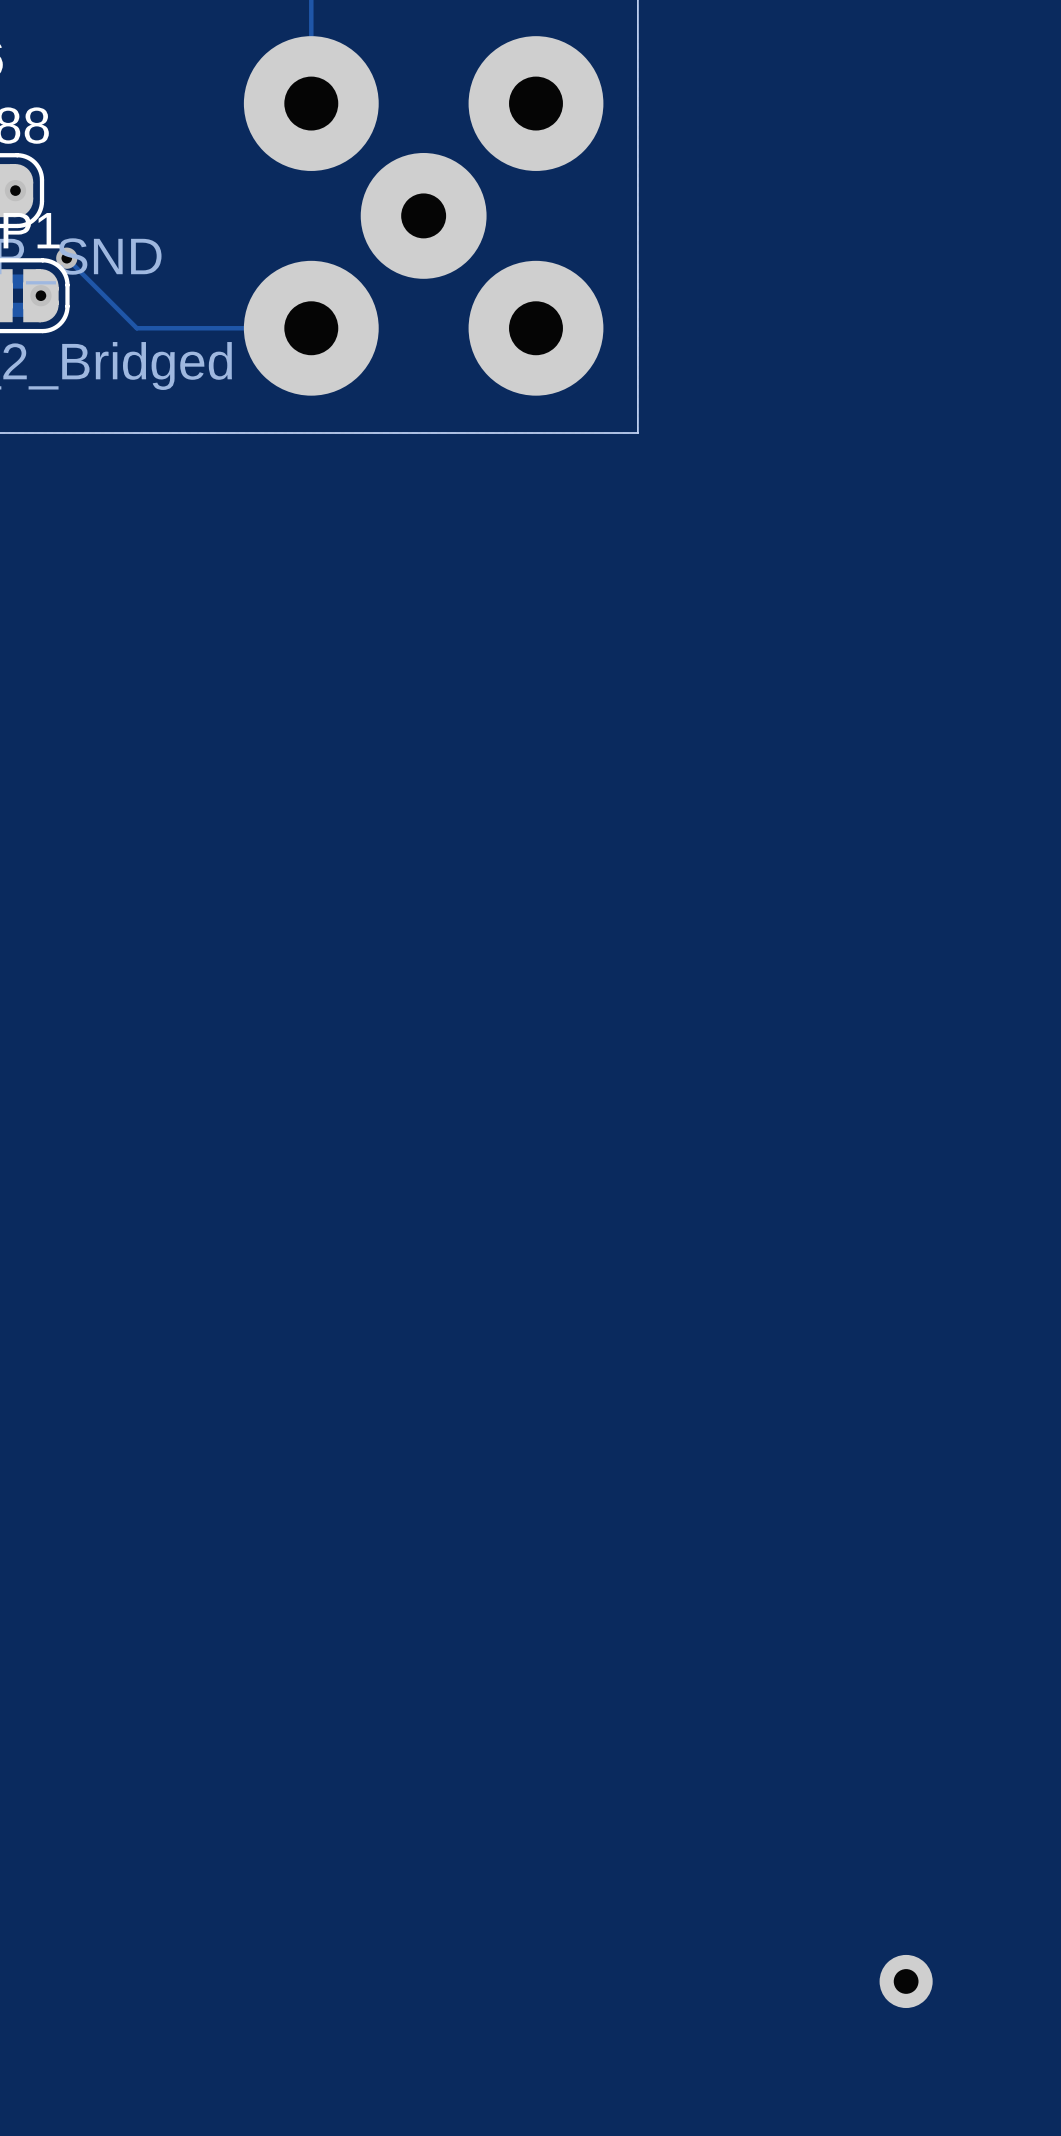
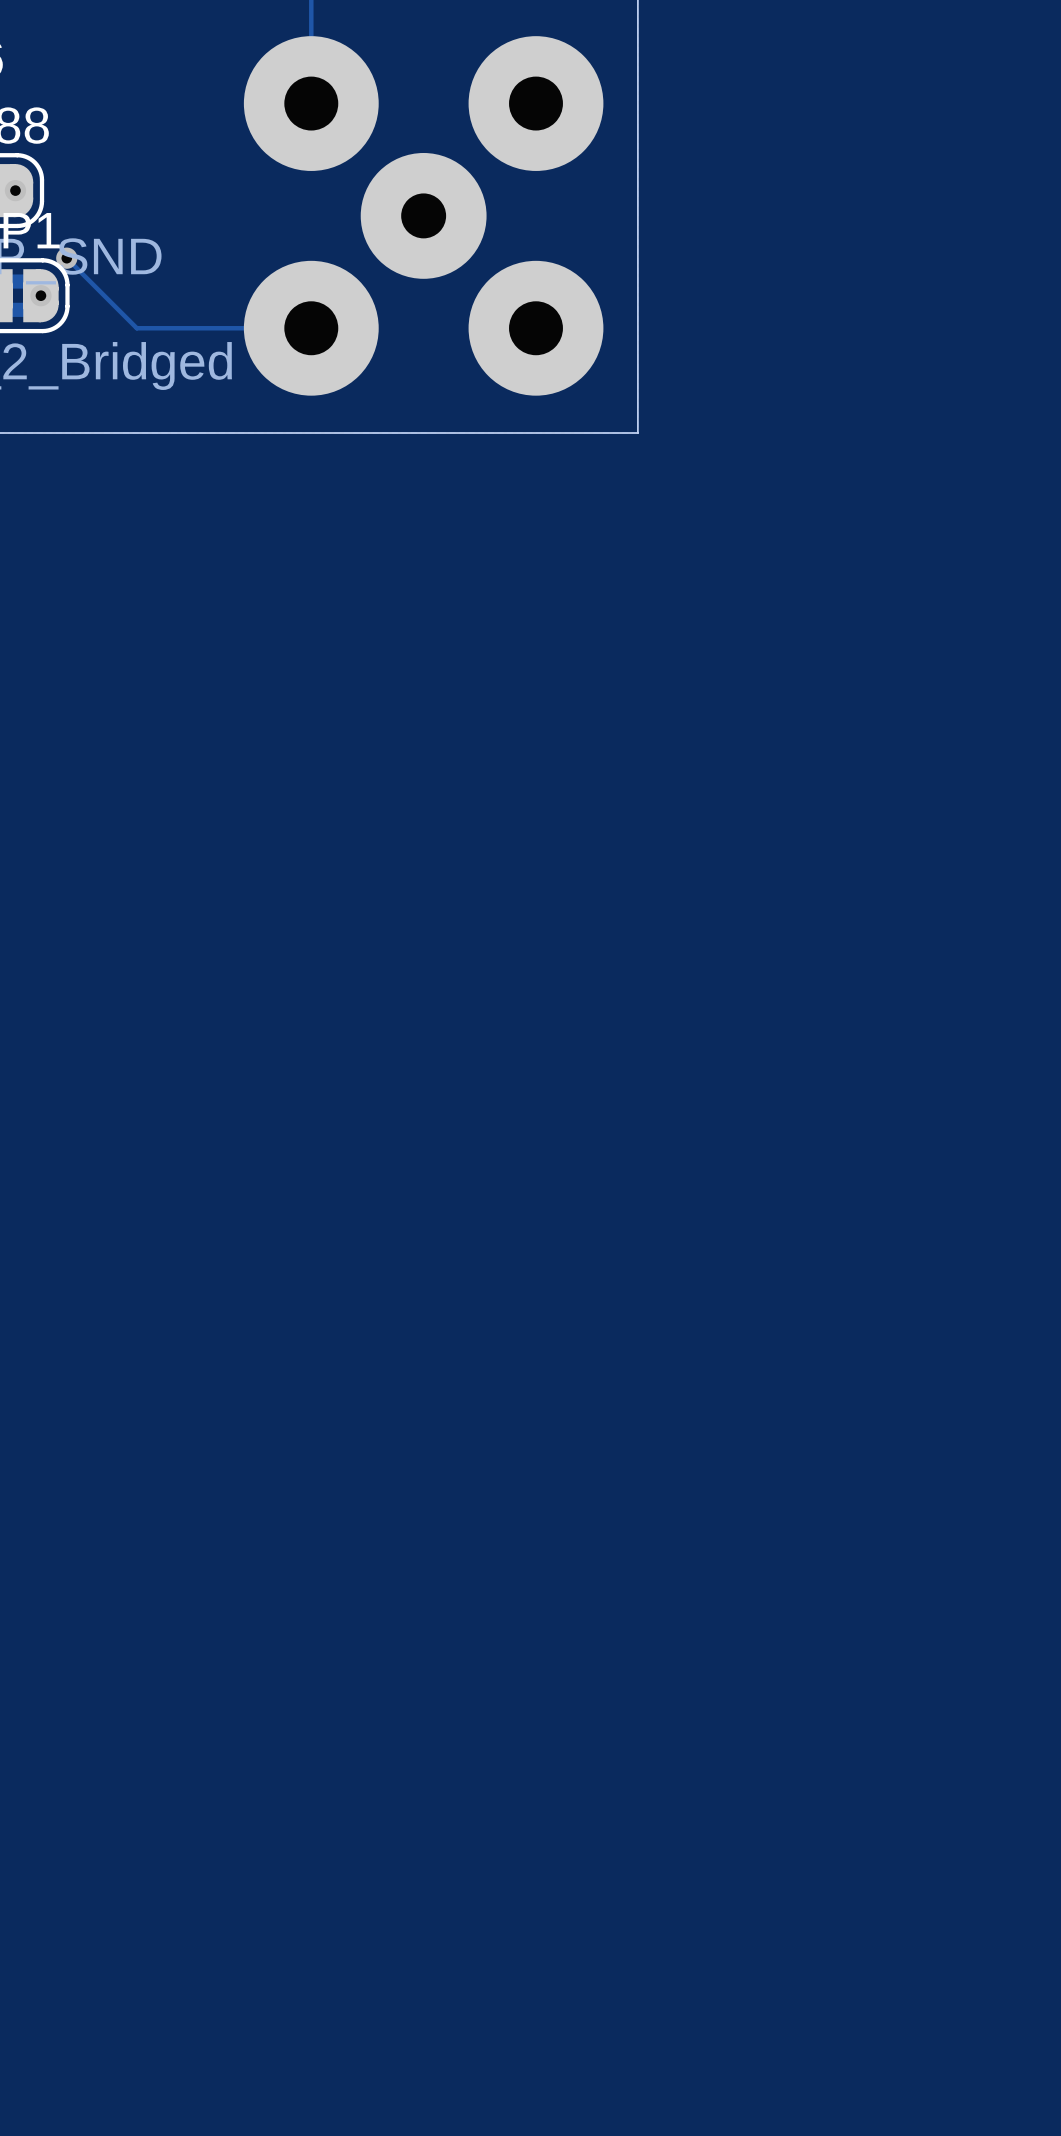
part: (906, 1981) -> none

